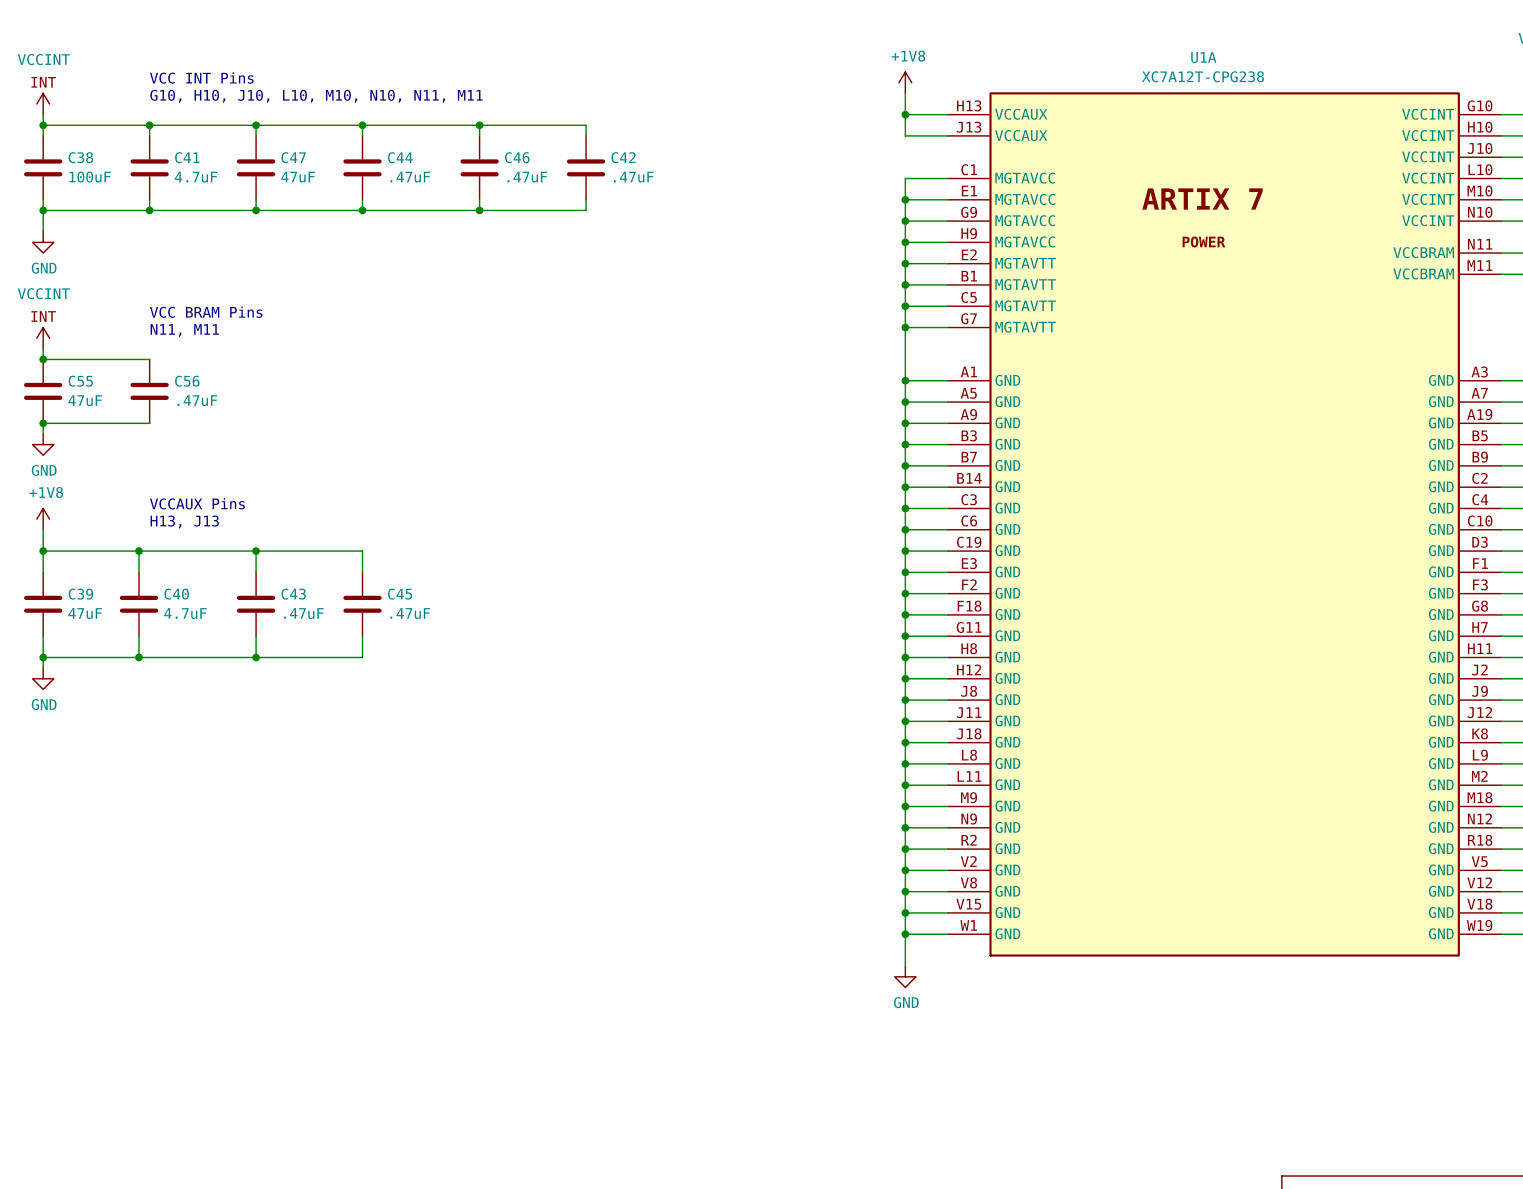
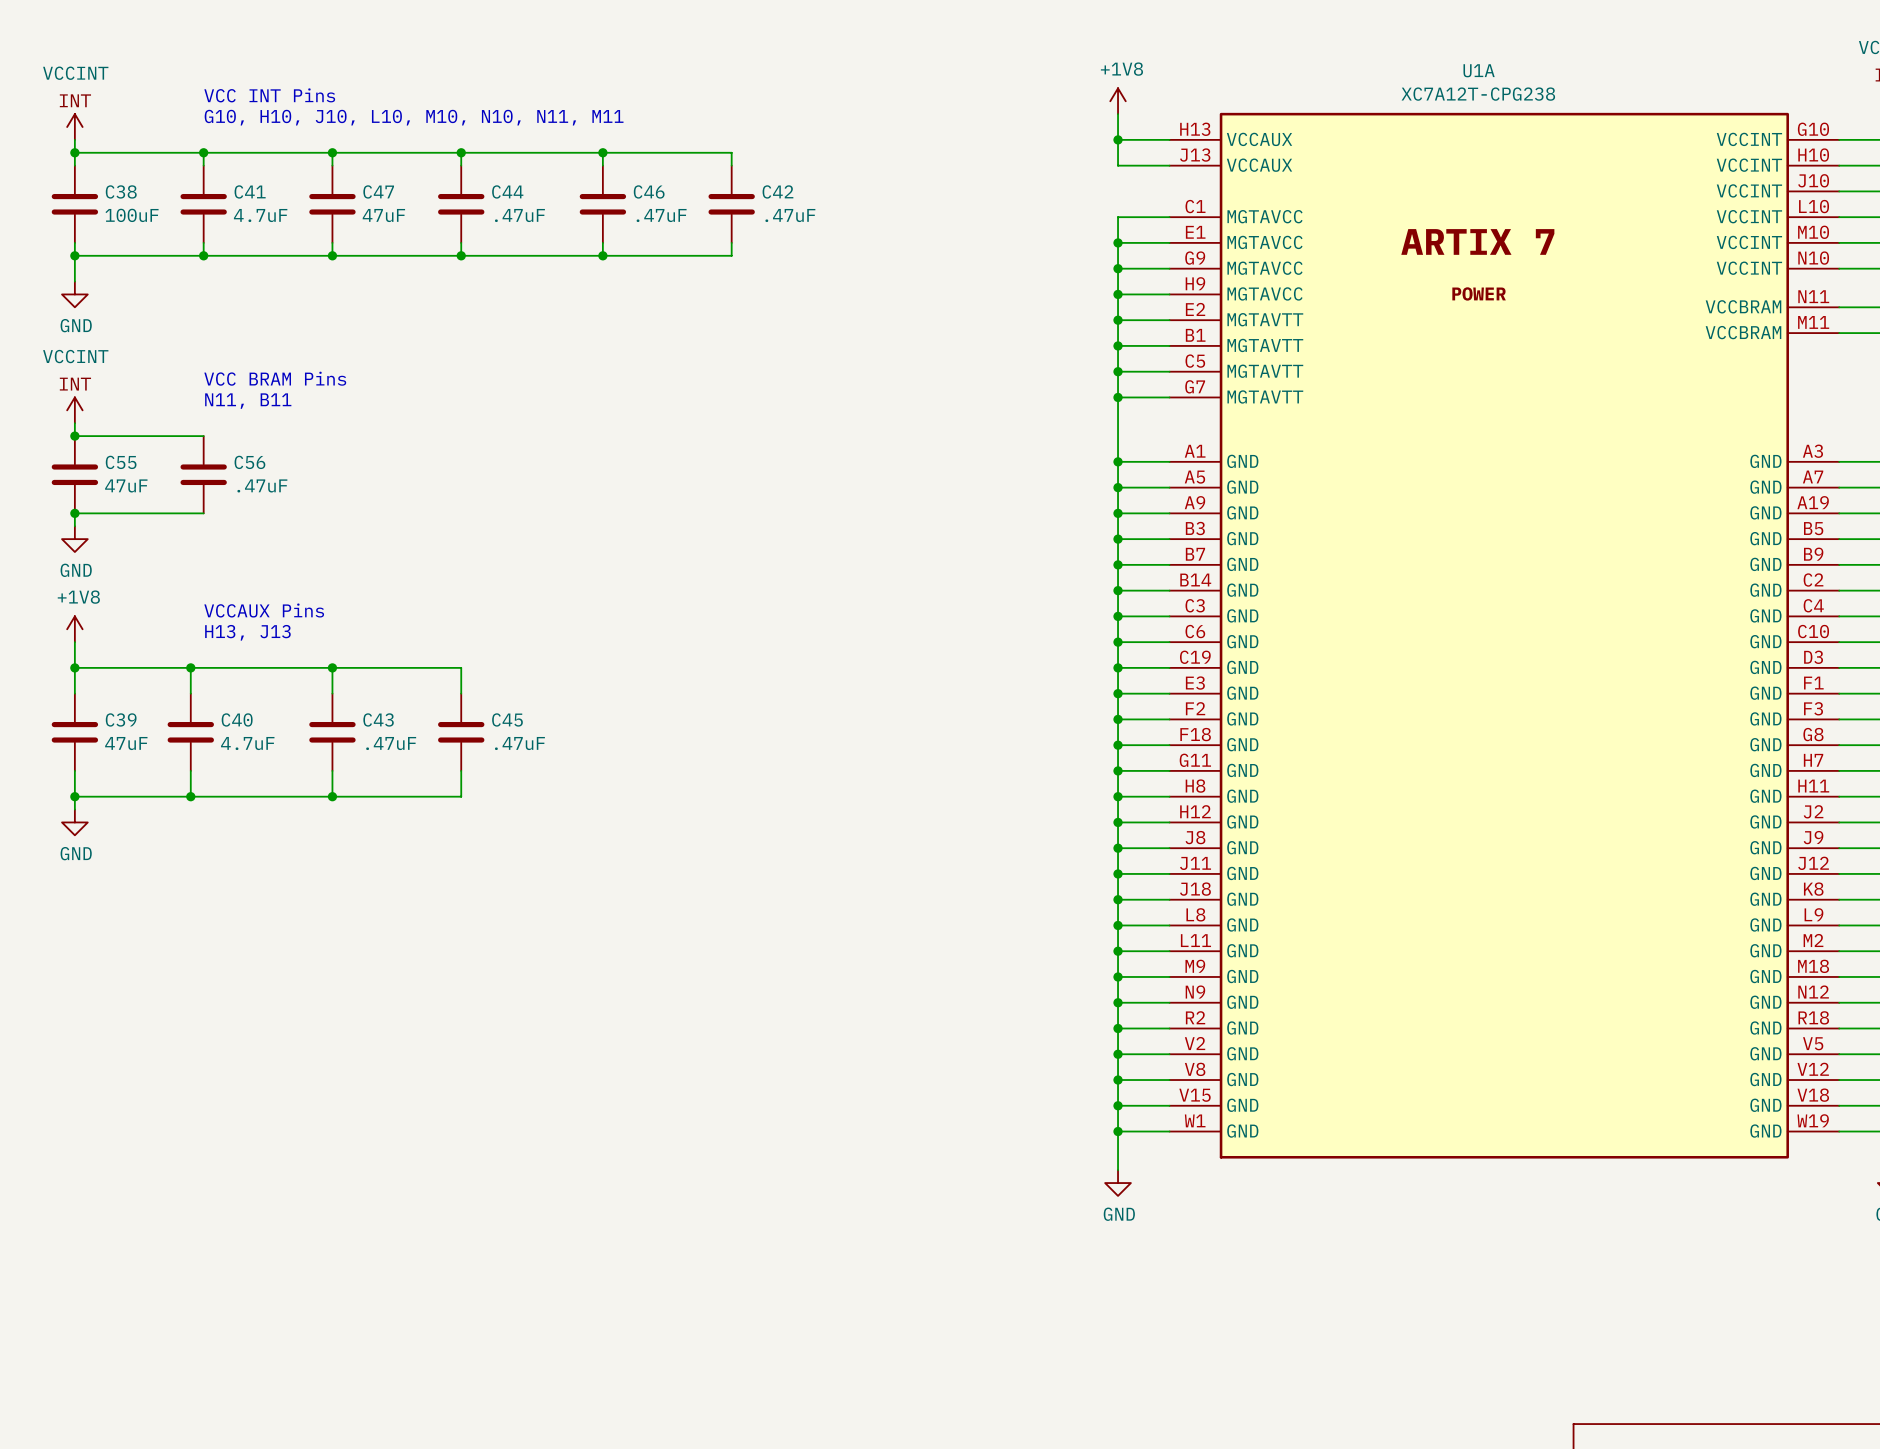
text: N11, M11 (184, 330) -> N11, B11 (248, 401)

